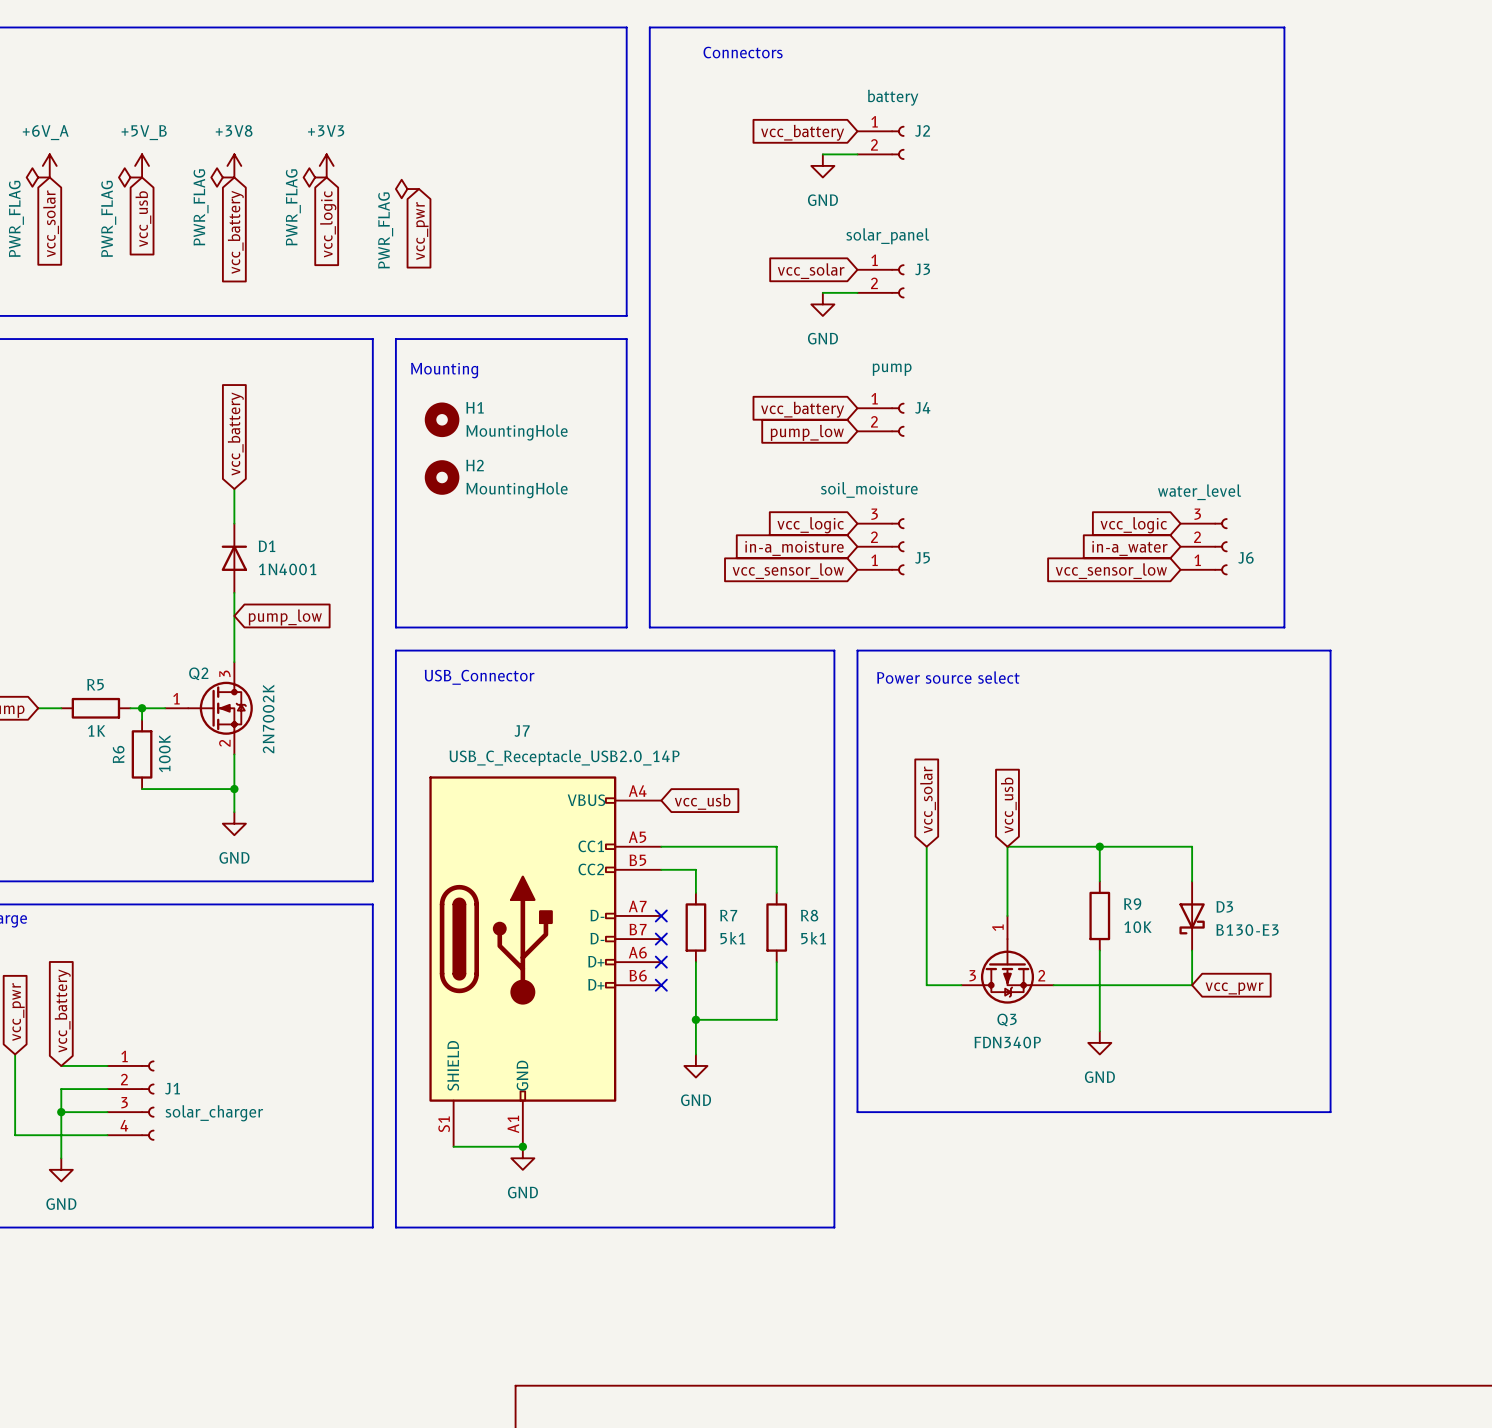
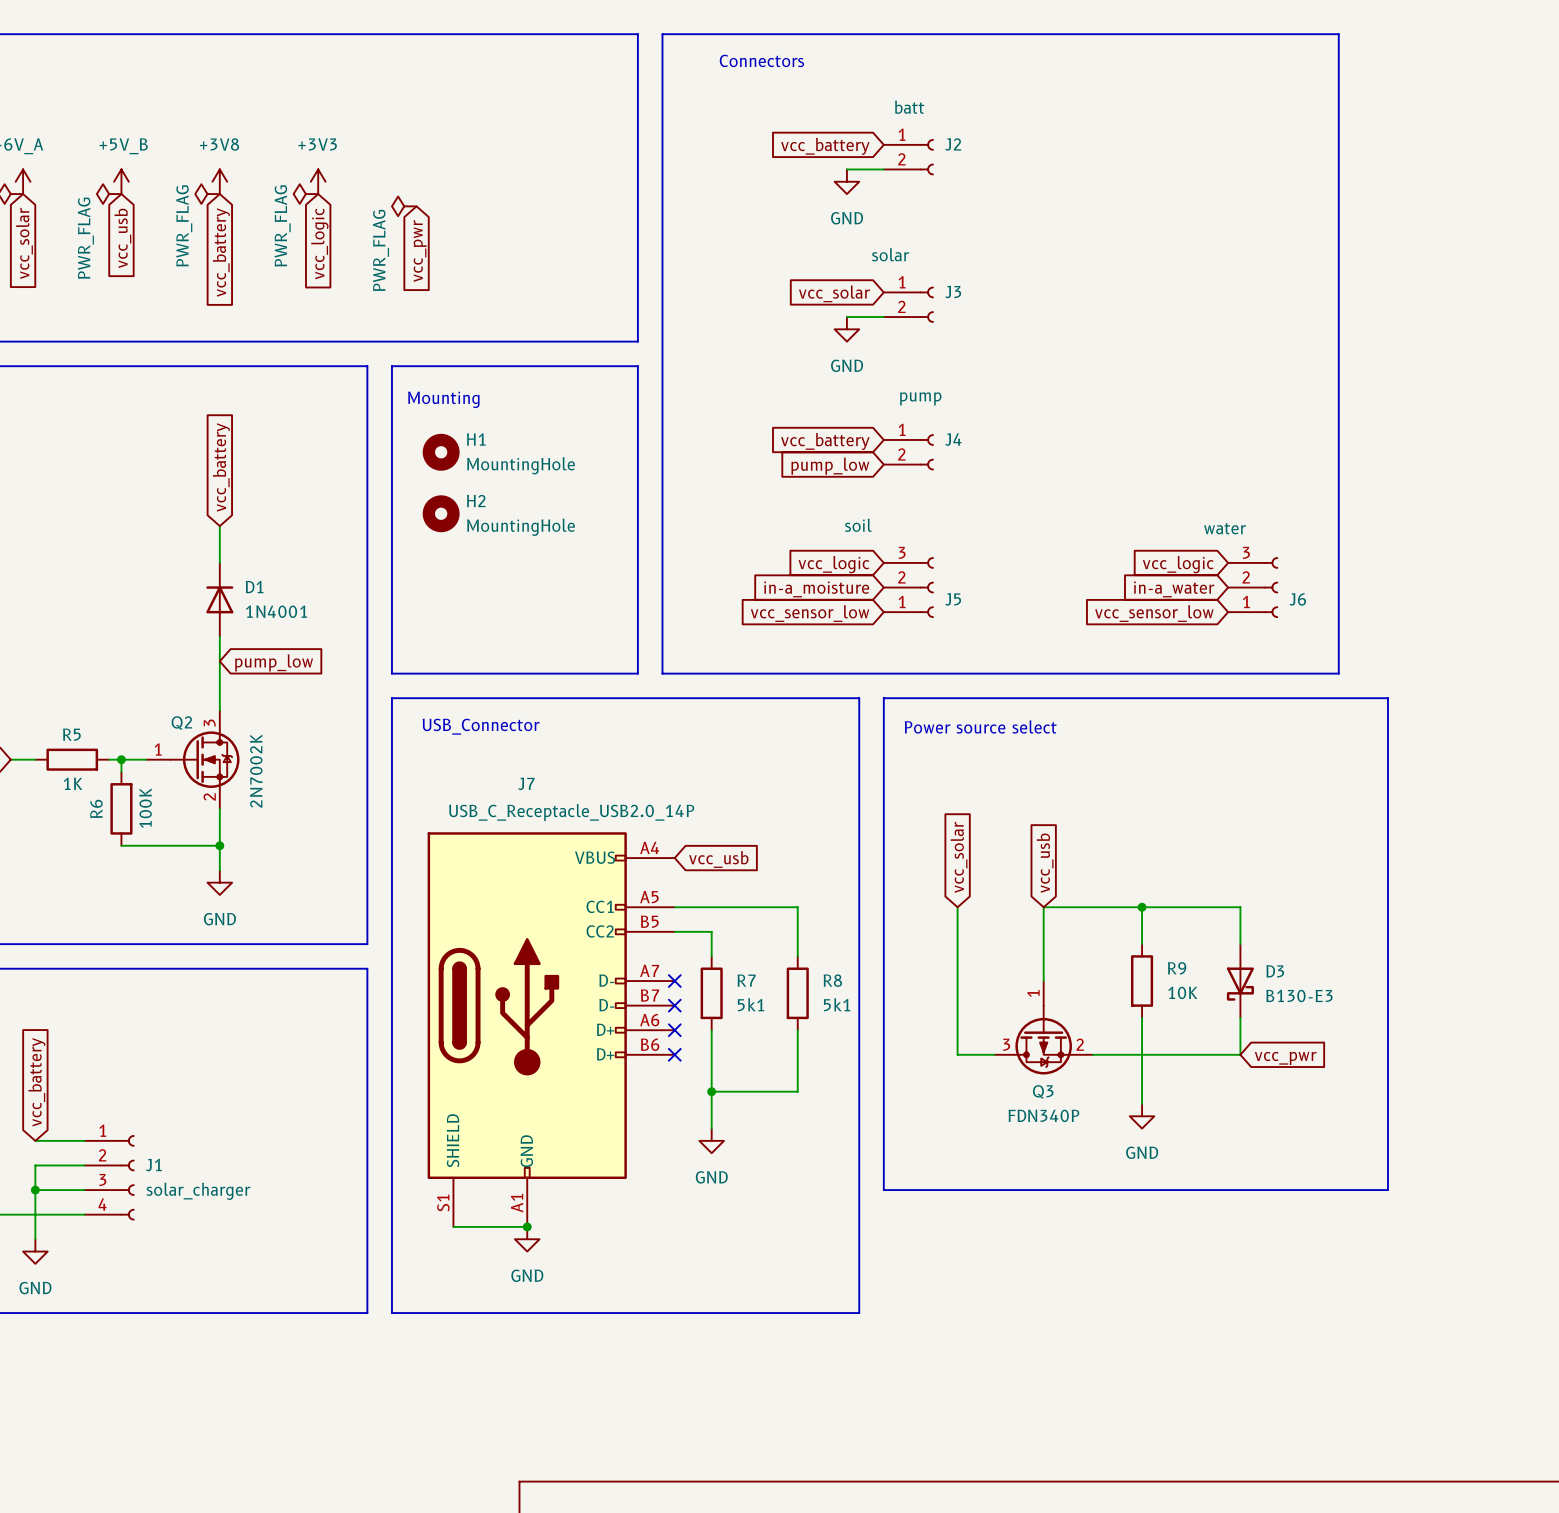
J2 value: battery (893, 97) -> batt (909, 107)
J3 value: solar_panel (887, 236) -> solar (890, 254)
J5 value: soil_moisture (869, 489) -> soil (858, 525)
J6 value: water_level (1199, 492) -> water (1225, 528)

